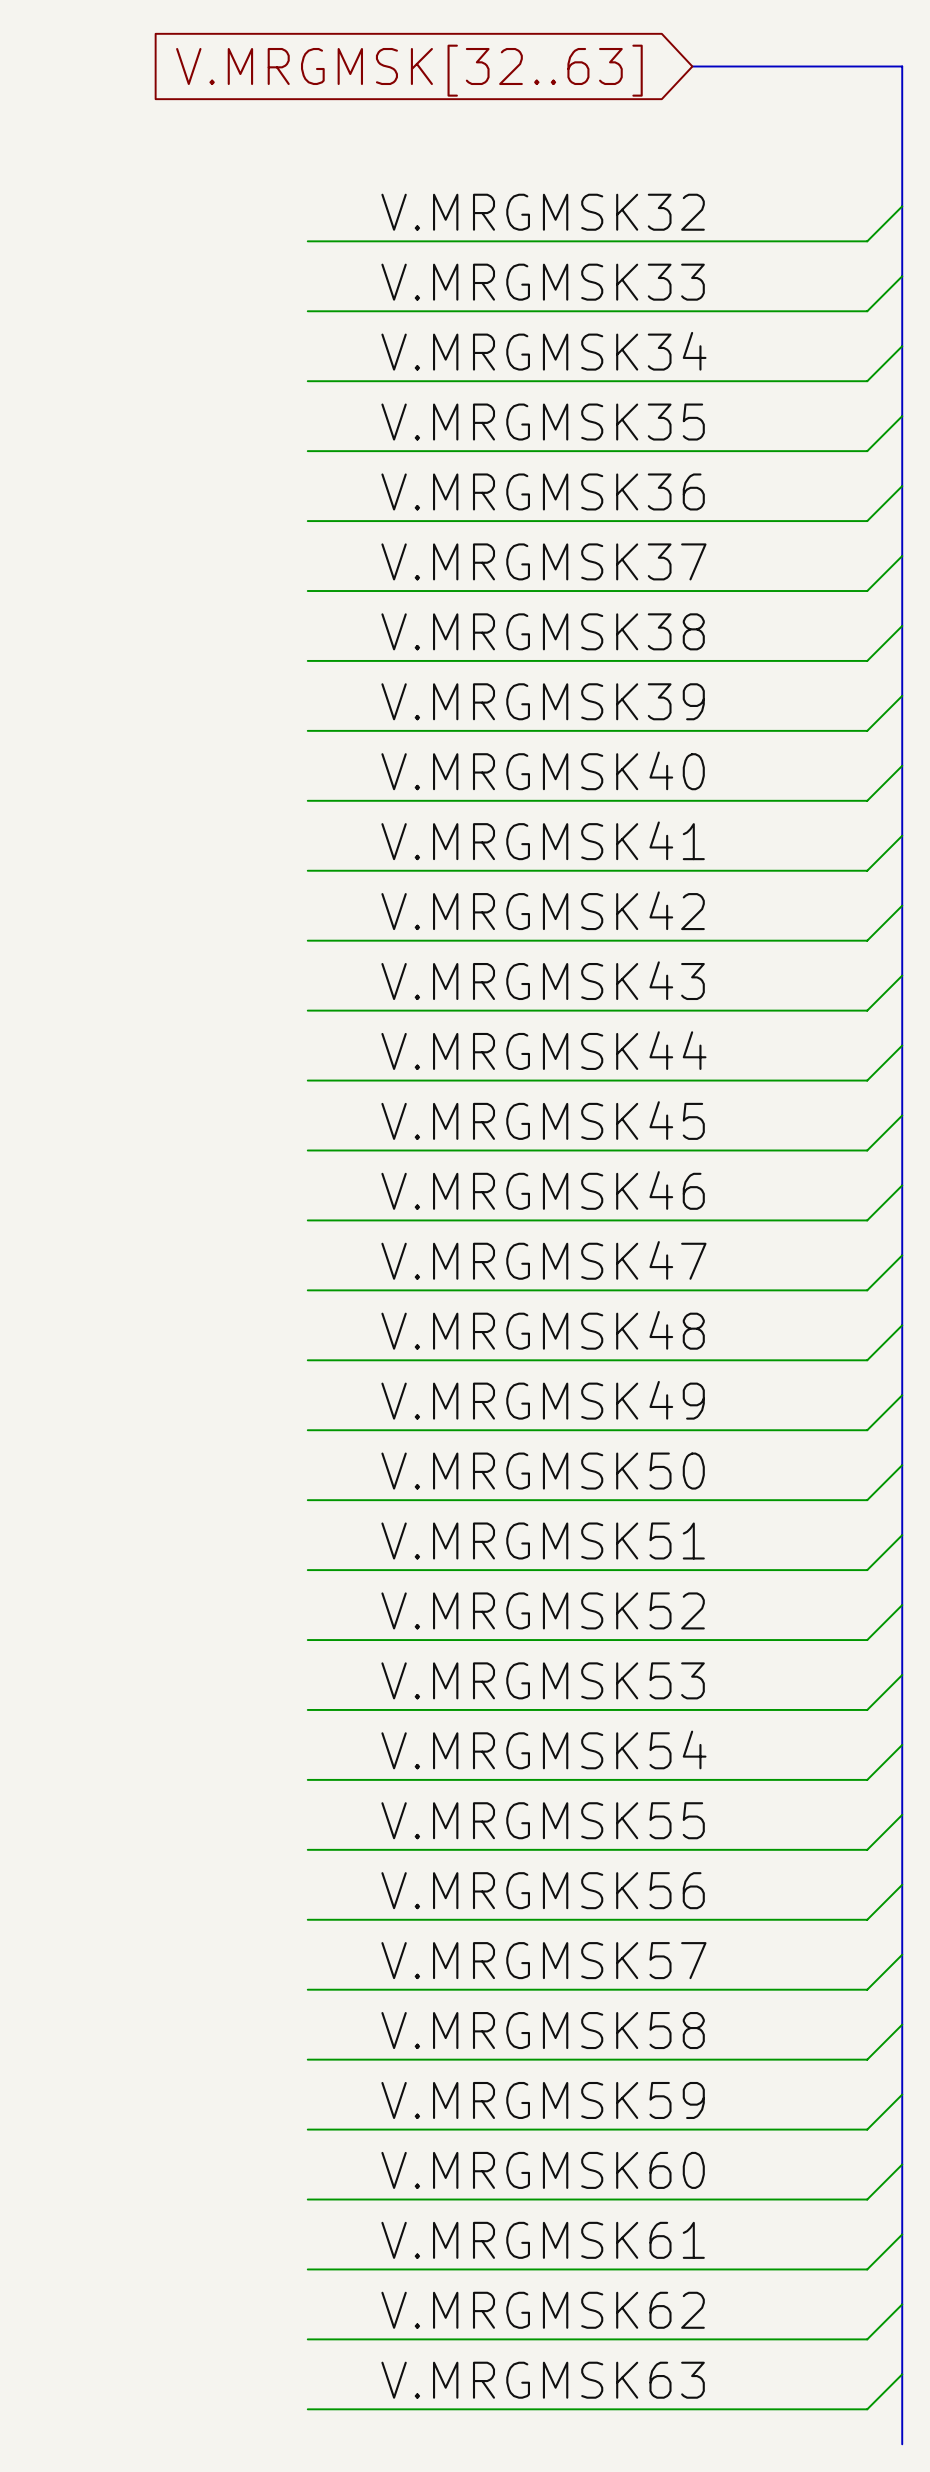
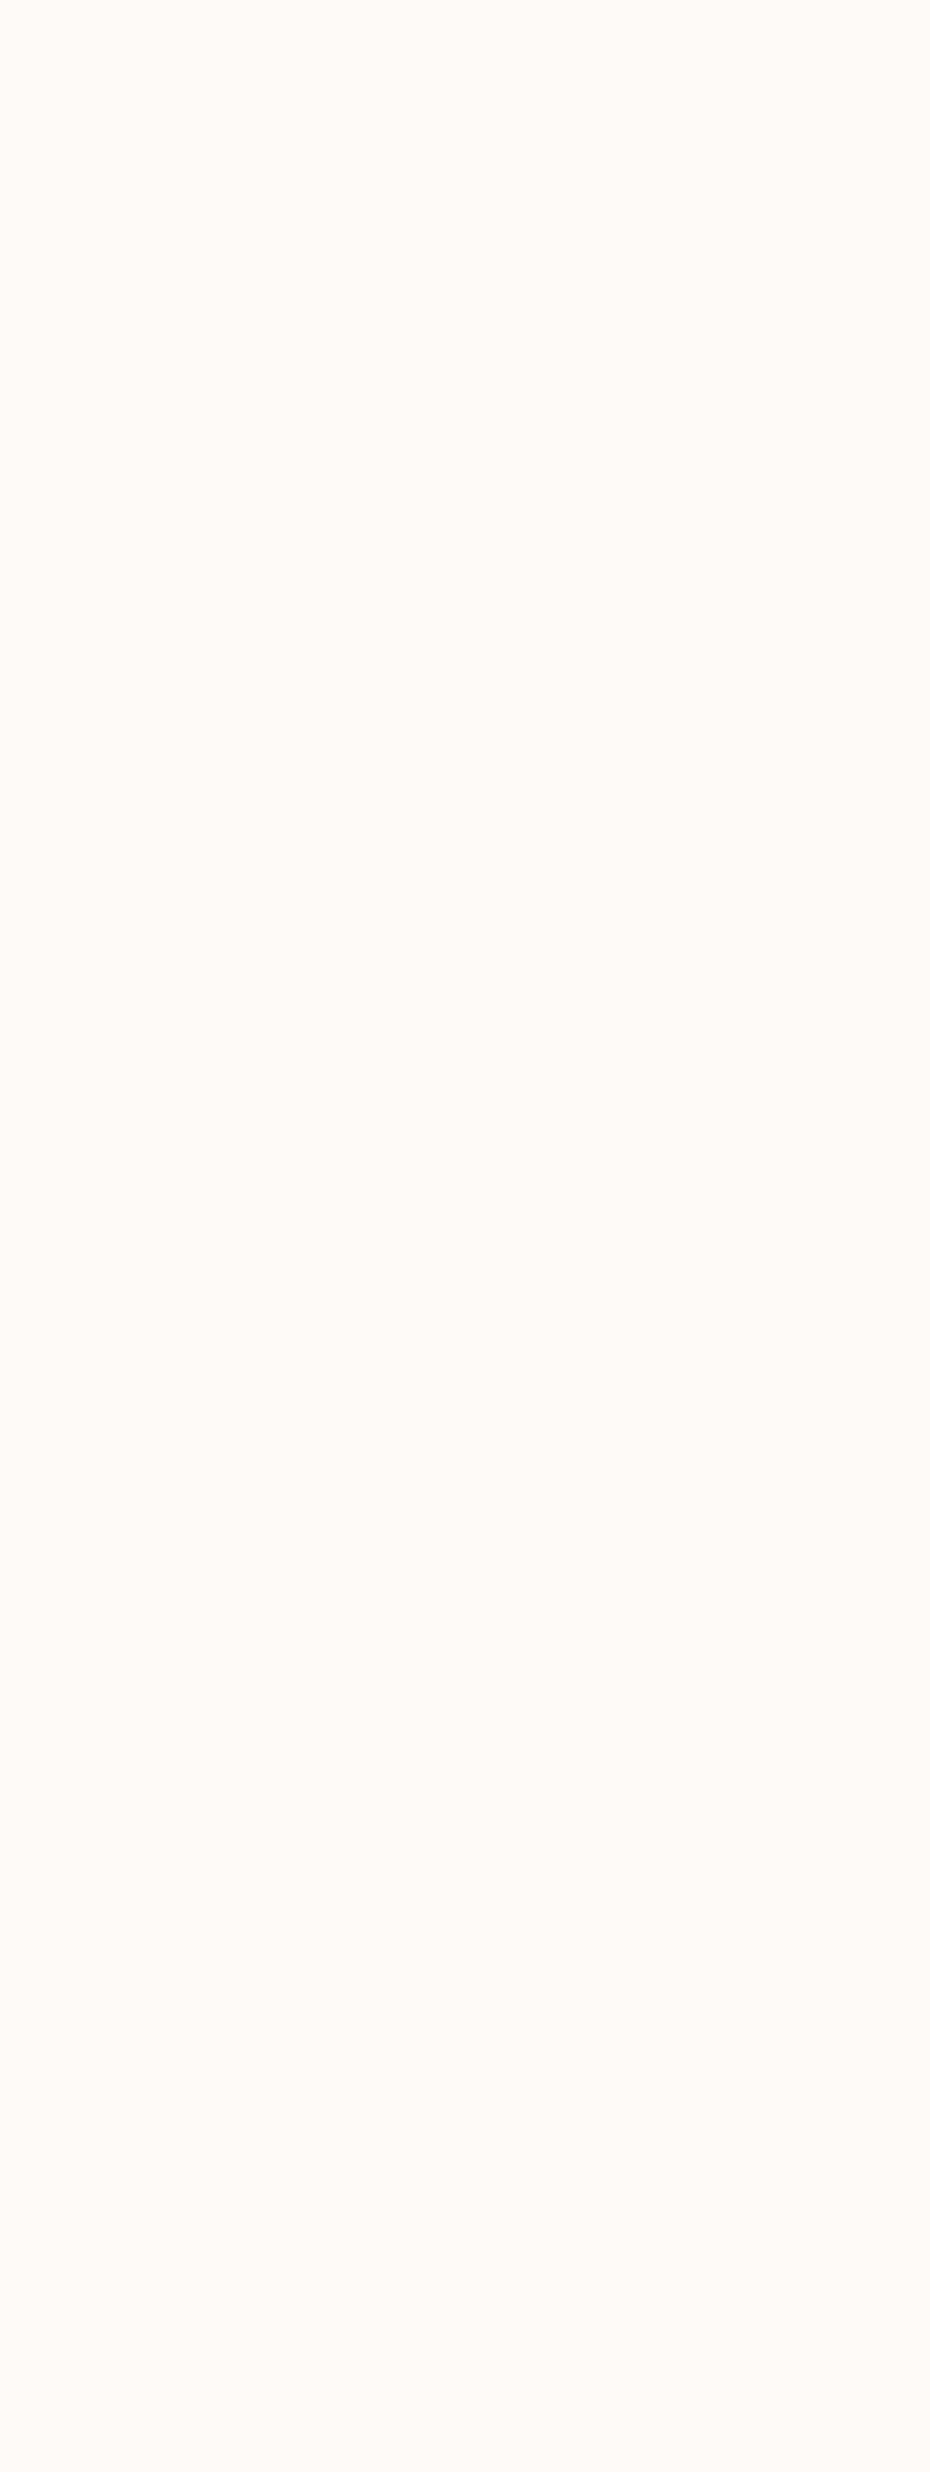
bus: (692, 66) (902, 66) (902, 2444) -> none
global label: V.MRGMSK[32..63] (409, 70) -> none
wire: (902, 206) (867, 241) (307, 241) -> none
label: V.MRGMSK32 (543, 212) -> none
wire: (902, 276) (867, 311) (307, 311) -> none
label: V.MRGMSK33 (543, 282) -> none
wire: (902, 346) (867, 381) (307, 381) -> none
label: V.MRGMSK34 (543, 351) -> none
wire: (902, 416) (867, 451) (307, 451) -> none
label: V.MRGMSK35 (543, 422) -> none
wire: (902, 486) (867, 521) (307, 521) -> none
label: V.MRGMSK36 (543, 491) -> none
wire: (902, 556) (867, 591) (307, 591) -> none
label: V.MRGMSK37 (543, 561) -> none
wire: (902, 625) (867, 660) (307, 660) -> none
label: V.MRGMSK38 (543, 631) -> none
wire: (902, 695) (867, 730) (307, 730) -> none
label: V.MRGMSK39 (543, 701) -> none
wire: (902, 765) (867, 800) (307, 800) -> none
label: V.MRGMSK40 (543, 770) -> none
wire: (902, 835) (867, 870) (307, 870) -> none
label: V.MRGMSK41 (543, 840) -> none
wire: (902, 905) (867, 940) (307, 940) -> none
label: V.MRGMSK42 (543, 910) -> none
wire: (902, 975) (867, 1010) (307, 1010) -> none
label: V.MRGMSK43 (543, 980) -> none
wire: (902, 1045) (867, 1080) (307, 1080) -> none
label: V.MRGMSK44 (543, 1050) -> none
wire: (902, 1115) (867, 1150) (307, 1150) -> none
label: V.MRGMSK45 (543, 1120) -> none
wire: (902, 1185) (867, 1220) (307, 1220) -> none
label: V.MRGMSK46 (543, 1190) -> none
wire: (902, 1255) (867, 1290) (307, 1290) -> none
label: V.MRGMSK47 (543, 1260) -> none
wire: (902, 1325) (867, 1360) (307, 1360) -> none
label: V.MRGMSK48 (543, 1330) -> none
wire: (902, 1395) (867, 1430) (307, 1430) -> none
label: V.MRGMSK49 (543, 1400) -> none
wire: (902, 1465) (867, 1500) (307, 1500) -> none
label: V.MRGMSK50 (543, 1471) -> none
wire: (902, 1535) (867, 1570) (307, 1570) -> none
label: V.MRGMSK51 (543, 1540) -> none
wire: (902, 1605) (867, 1640) (307, 1640) -> none
label: V.MRGMSK52 (543, 1610) -> none
wire: (902, 1675) (867, 1709) (307, 1709) -> none
label: V.MRGMSK53 (543, 1680) -> none
wire: (902, 1744) (867, 1779) (307, 1779) -> none
label: V.MRGMSK54 (543, 1749) -> none
wire: (902, 1814) (867, 1849) (307, 1849) -> none
label: V.MRGMSK55 (543, 1820) -> none
wire: (902, 1884) (867, 1919) (307, 1919) -> none
label: V.MRGMSK56 (543, 1890) -> none
wire: (902, 1954) (867, 1989) (307, 1989) -> none
label: V.MRGMSK57 (543, 1960) -> none
wire: (902, 2024) (867, 2059) (307, 2059) -> none
label: V.MRGMSK58 (543, 2030) -> none
wire: (902, 2094) (867, 2129) (307, 2129) -> none
label: V.MRGMSK59 (543, 2100) -> none
wire: (902, 2164) (867, 2199) (307, 2199) -> none
label: V.MRGMSK60 (543, 2170) -> none
wire: (902, 2234) (867, 2269) (307, 2269) -> none
label: V.MRGMSK61 (543, 2240) -> none
wire: (902, 2304) (867, 2339) (307, 2339) -> none
label: V.MRGMSK62 (543, 2310) -> none
wire: (902, 2374) (867, 2409) (307, 2409) -> none
label: V.MRGMSK63 (543, 2380) -> none

